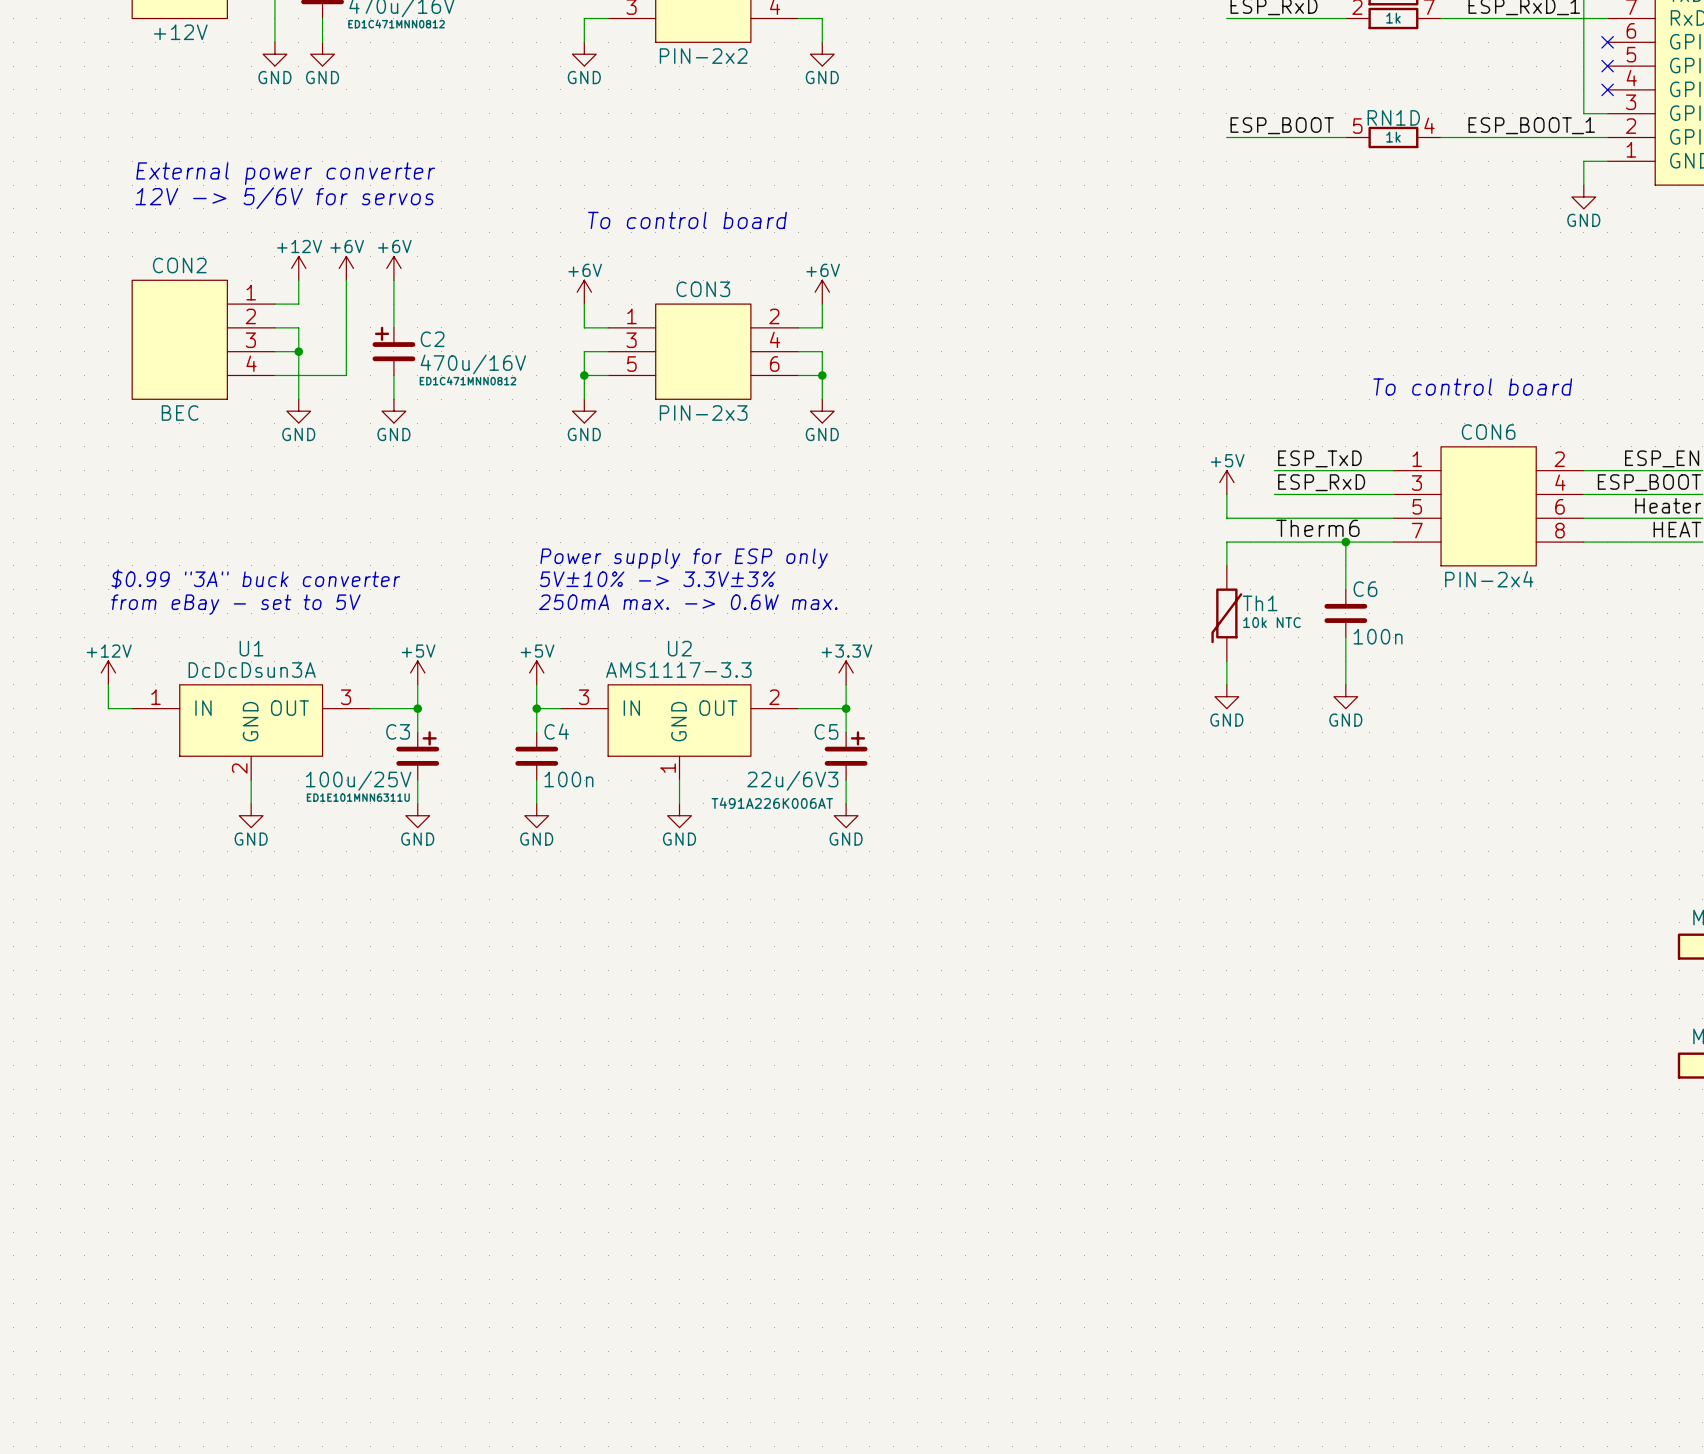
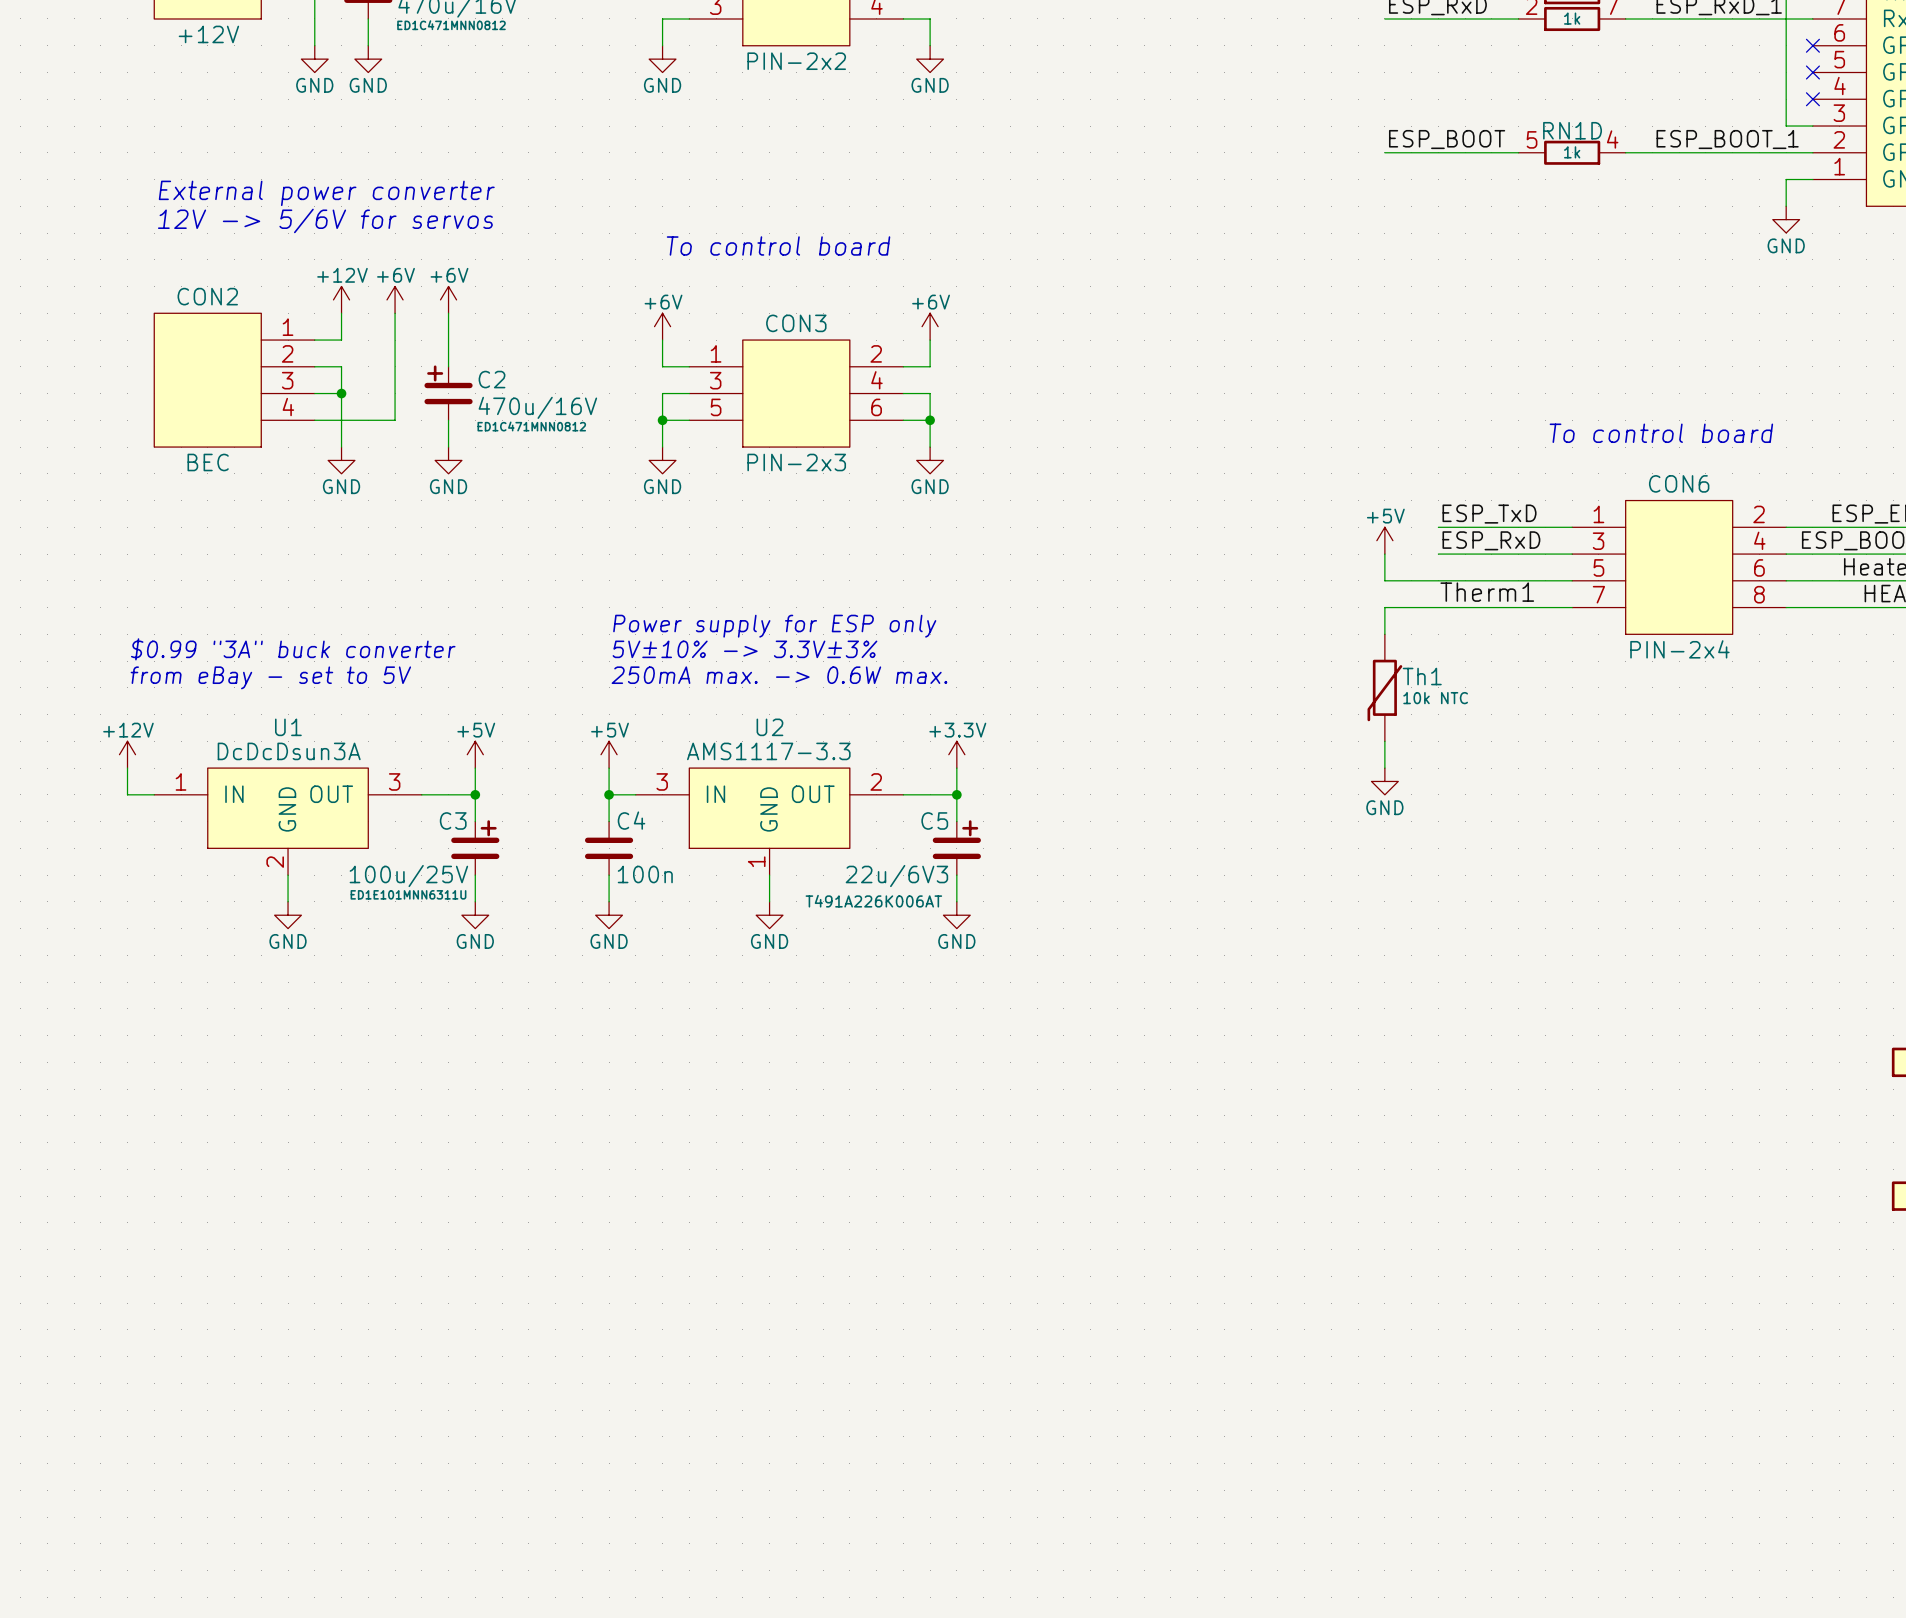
label: Therm6 (1317, 528) -> Therm1 (1487, 592)
wire: (1345, 542) (1345, 589) -> none
junction: (1345, 542) -> none
C6: 100n (1345, 613) -> none
wire: (1345, 637) (1345, 684) -> none
power symbol: GND (1345, 696) -> none

